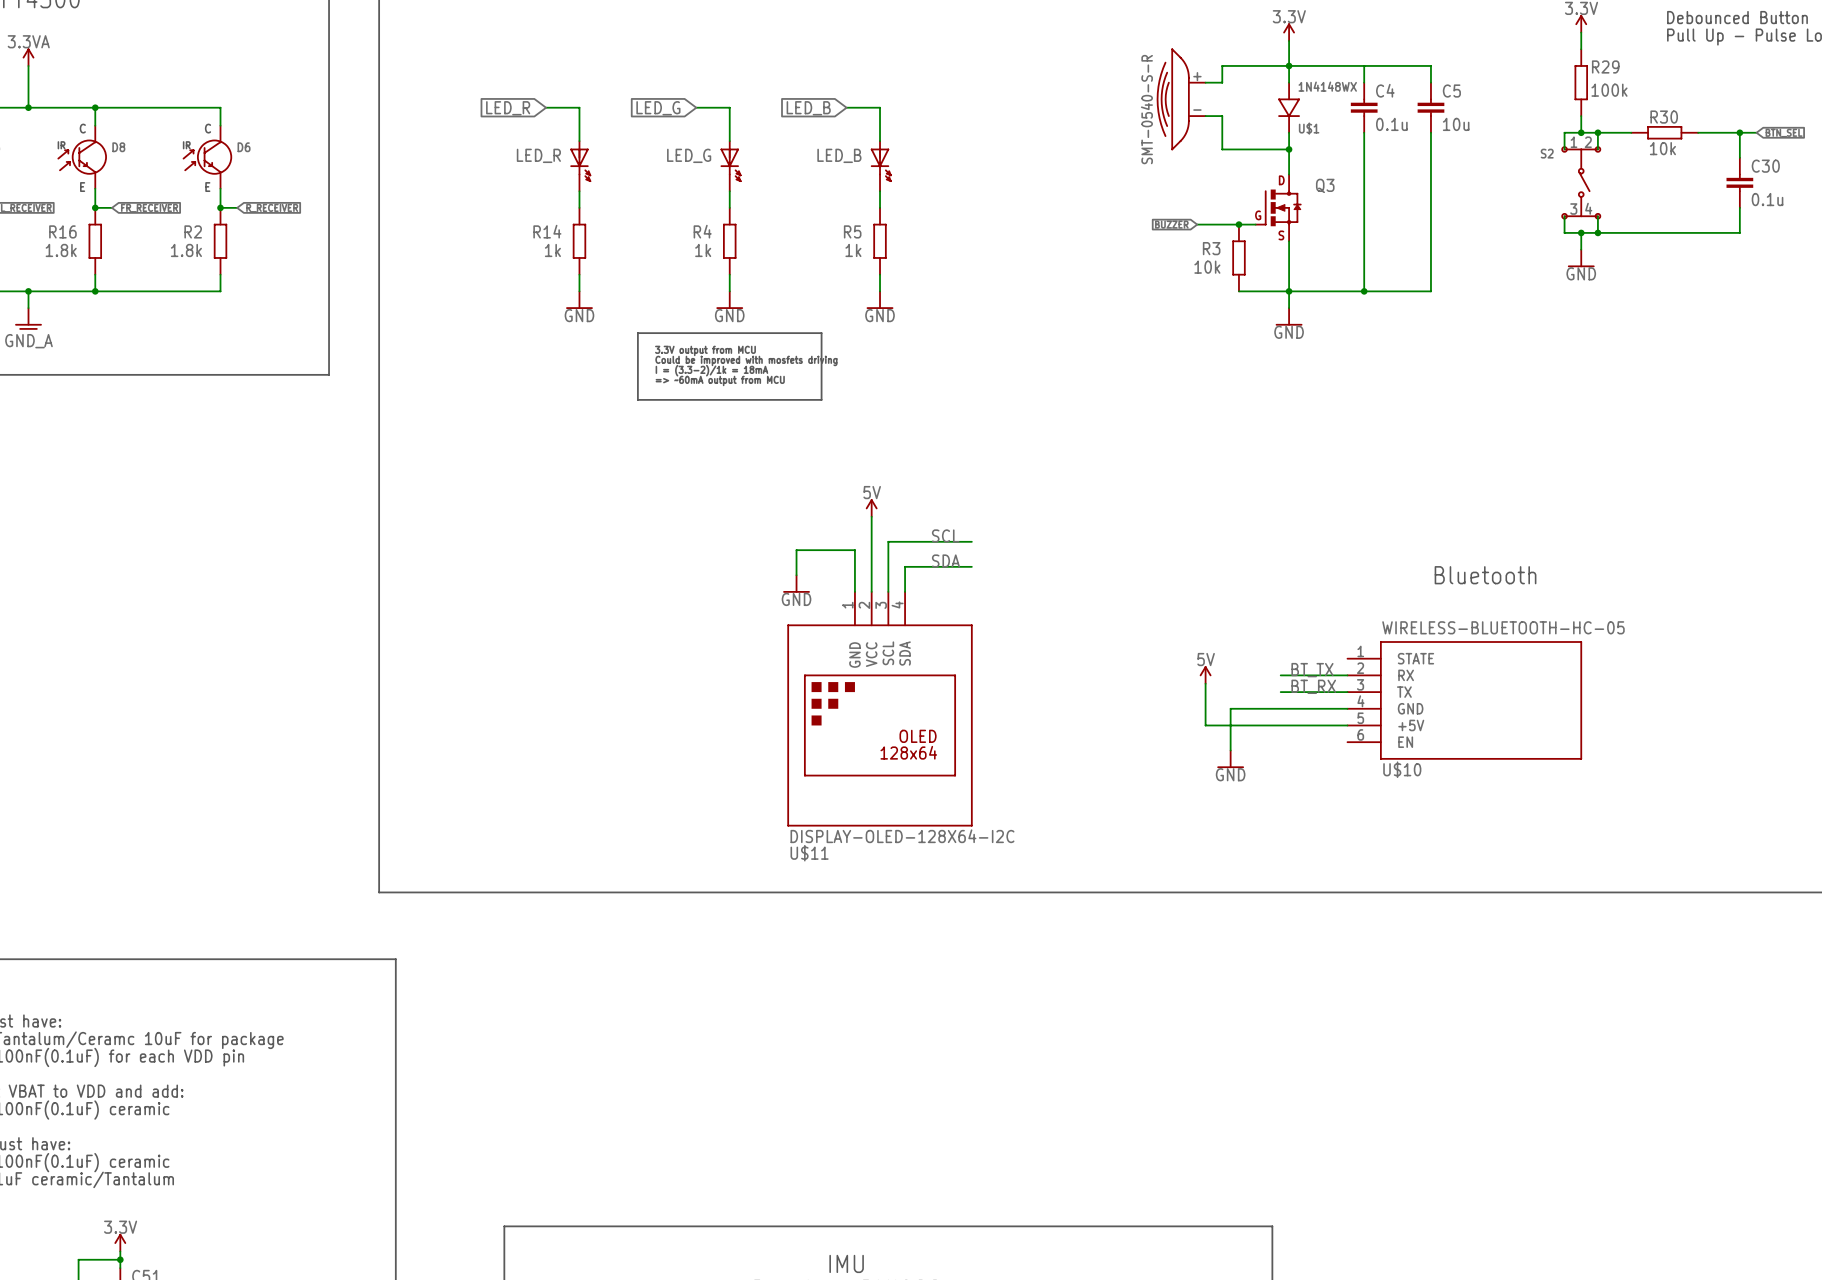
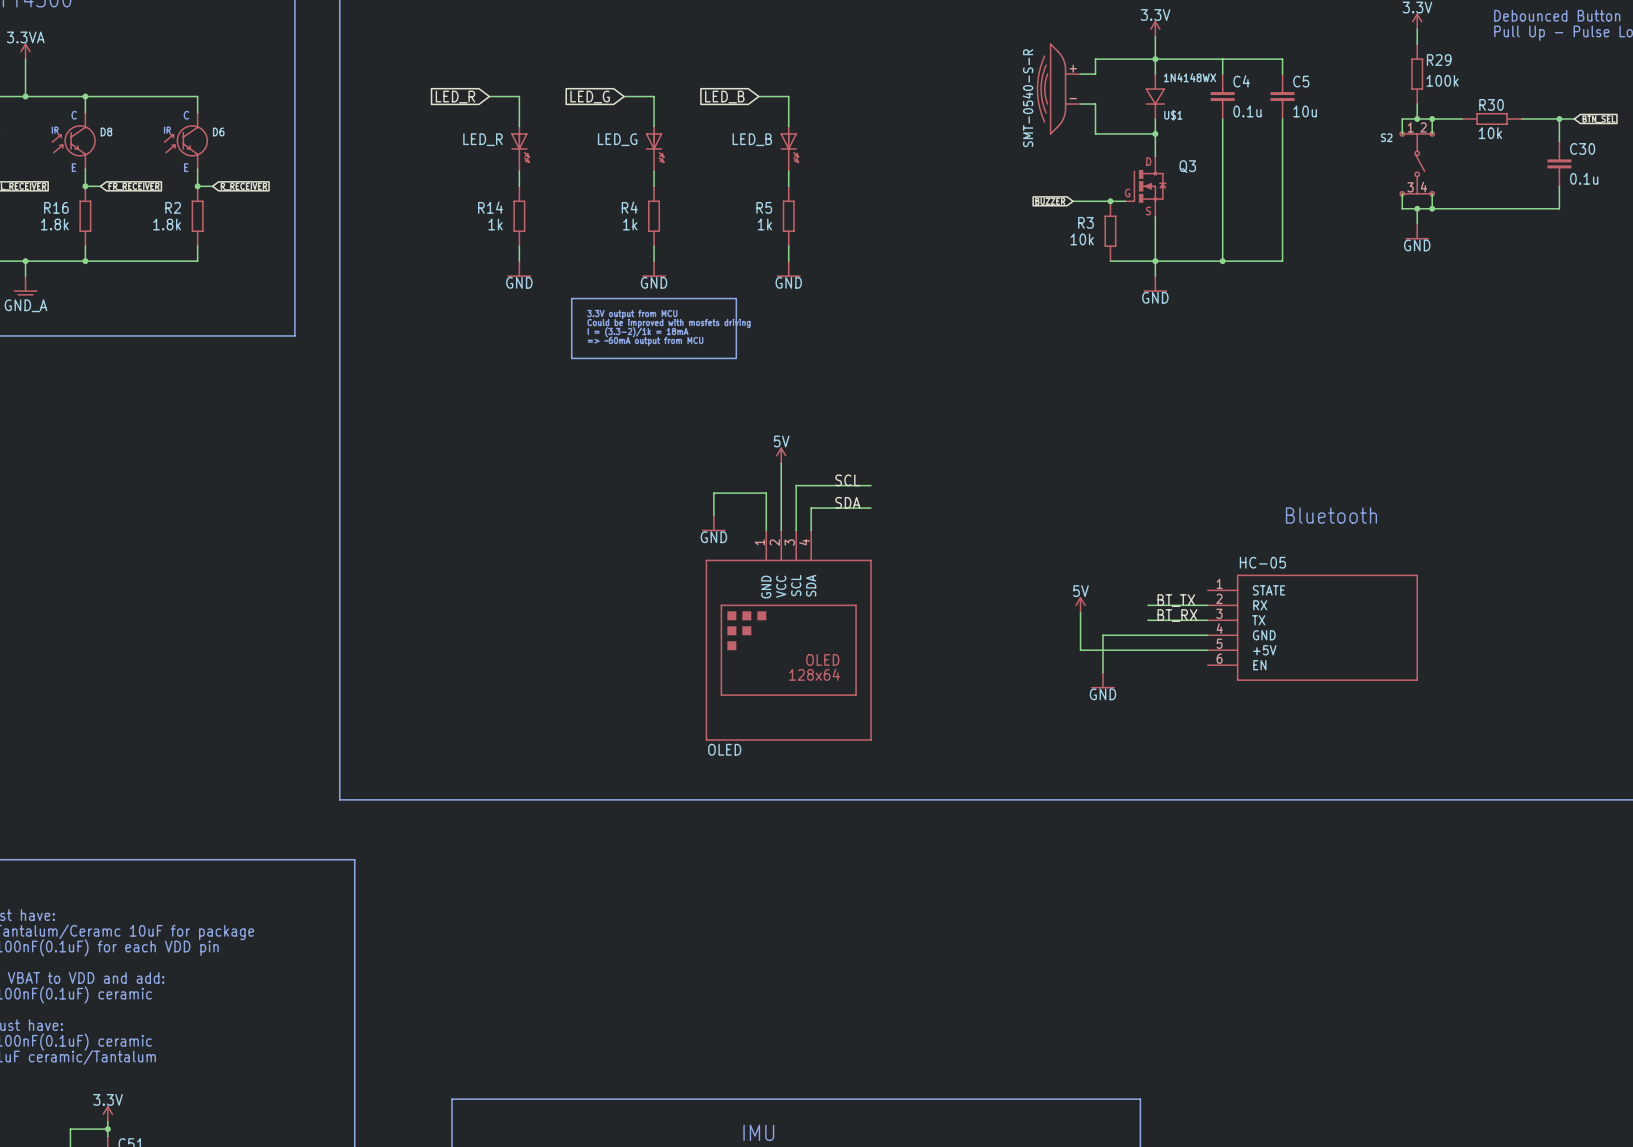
U$10 value: WIRELESS-BLUETOOTH-HC-05 (1503, 627) -> none
U$10 name: U$10 (1402, 769) -> HC-05 (1262, 562)
U$11 value: DISPLAY-OLED-128X64-I2C (902, 836) -> none
U$11 name: U$11 (809, 853) -> OLED (724, 749)

